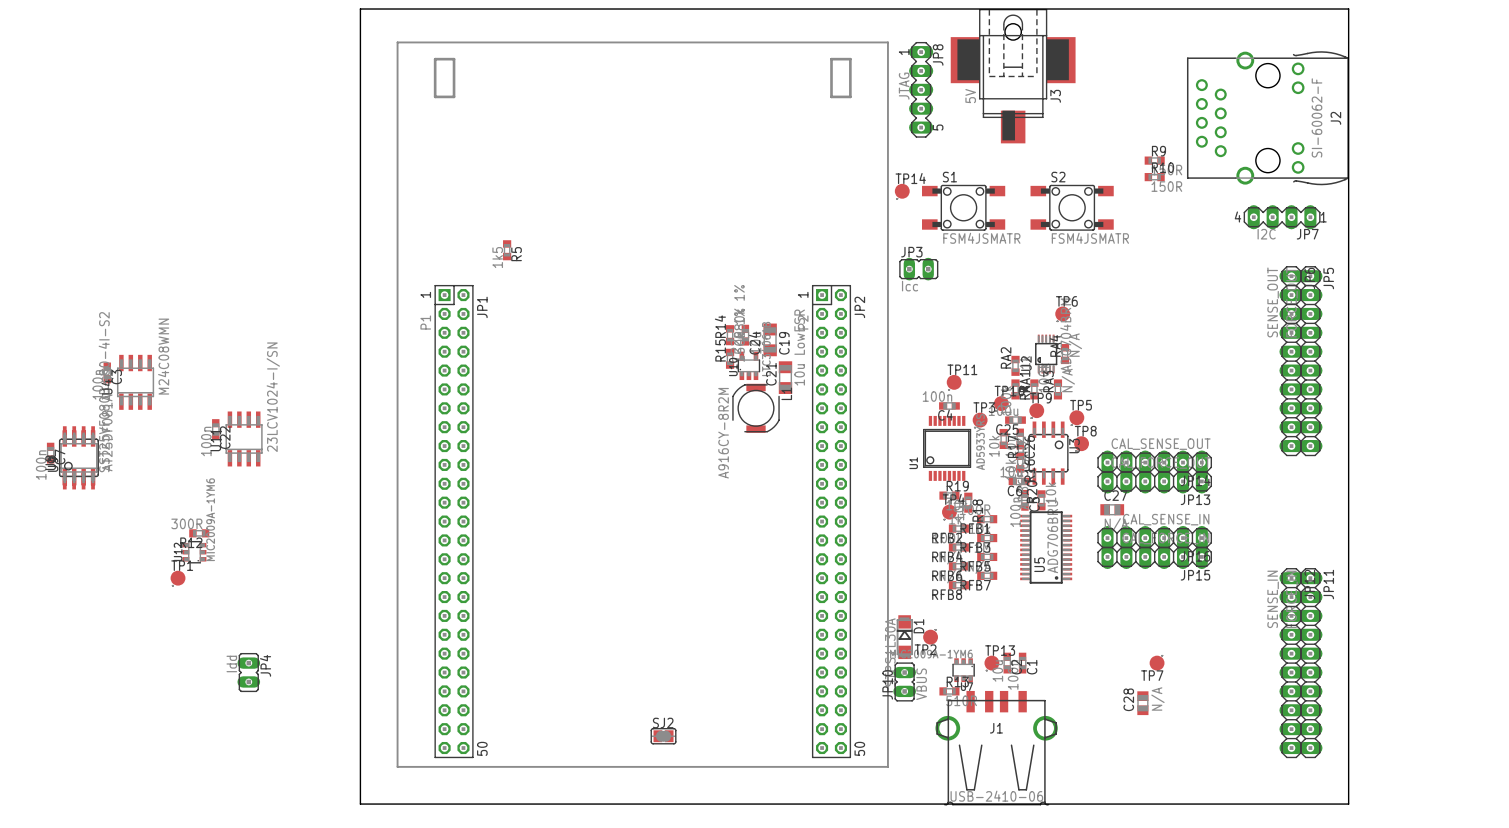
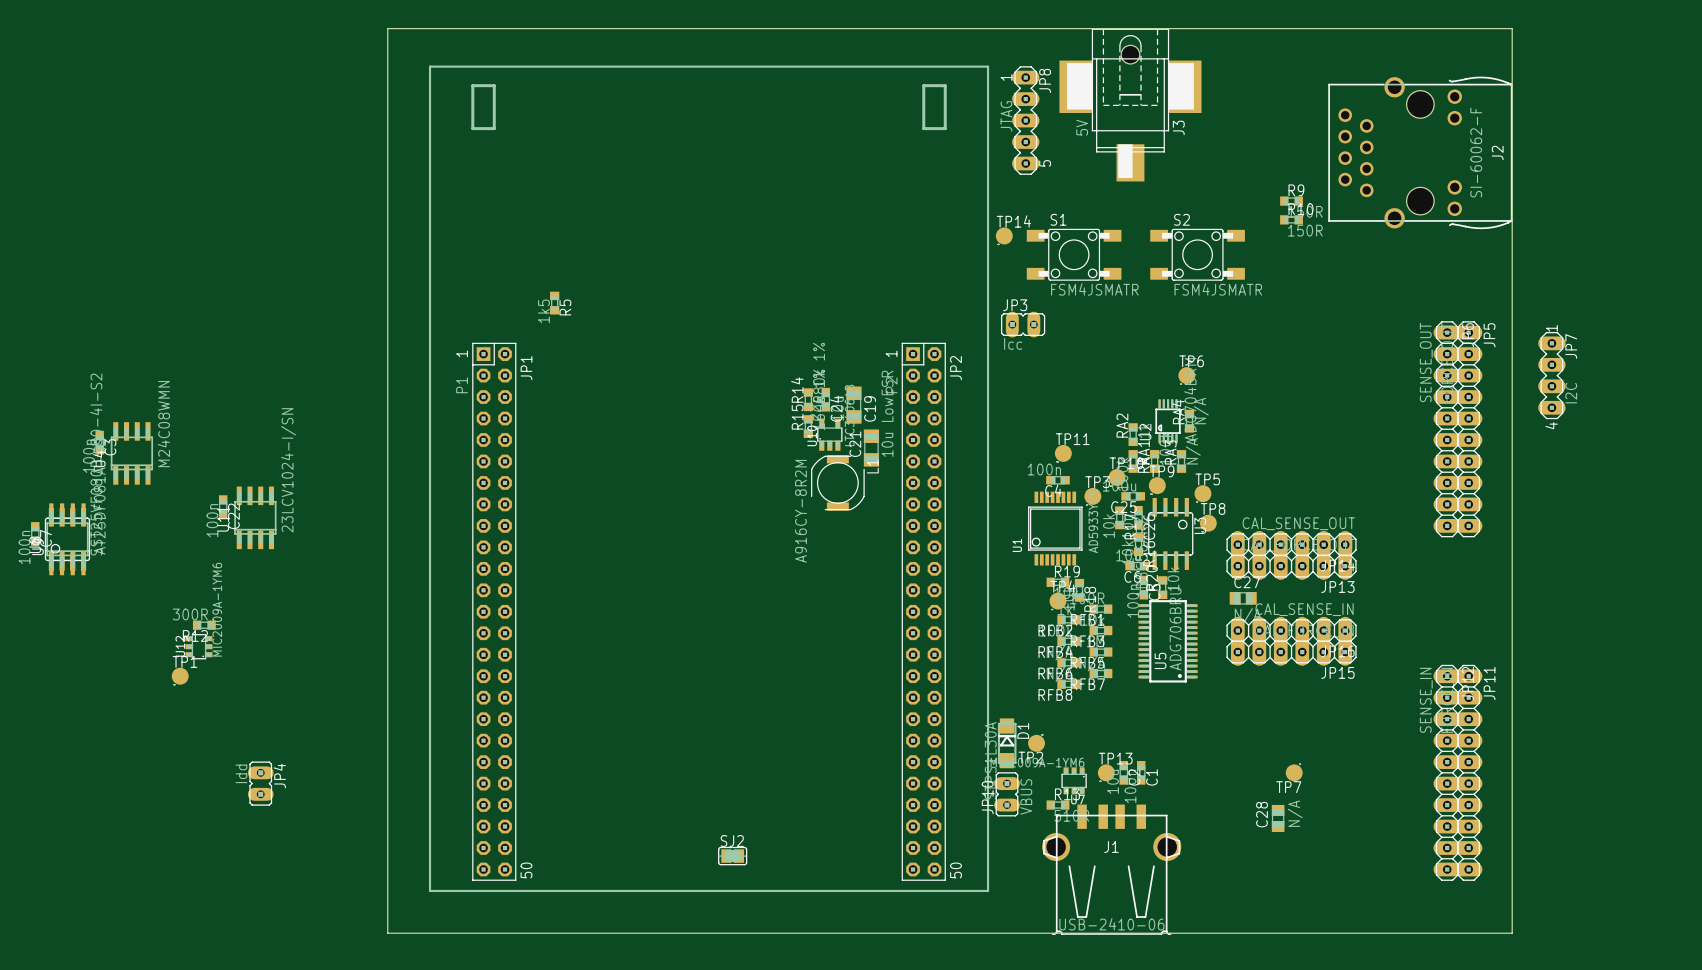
JP7 rotation: 0° (1282, 217) -> 90° counterclockwise (1551, 375)
JP7 position: (1282, 217) -> (1551, 375)

